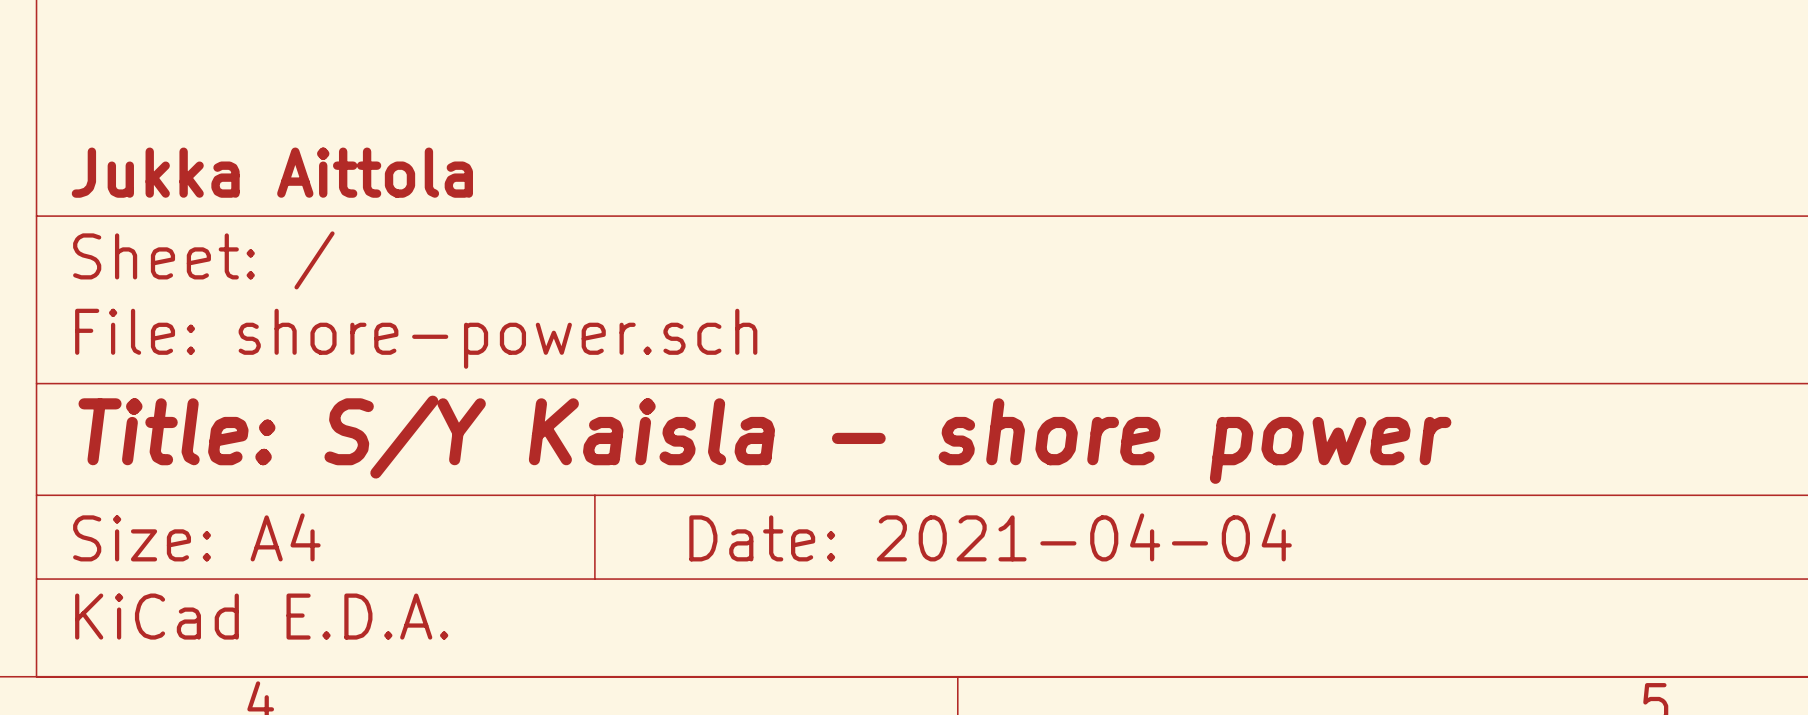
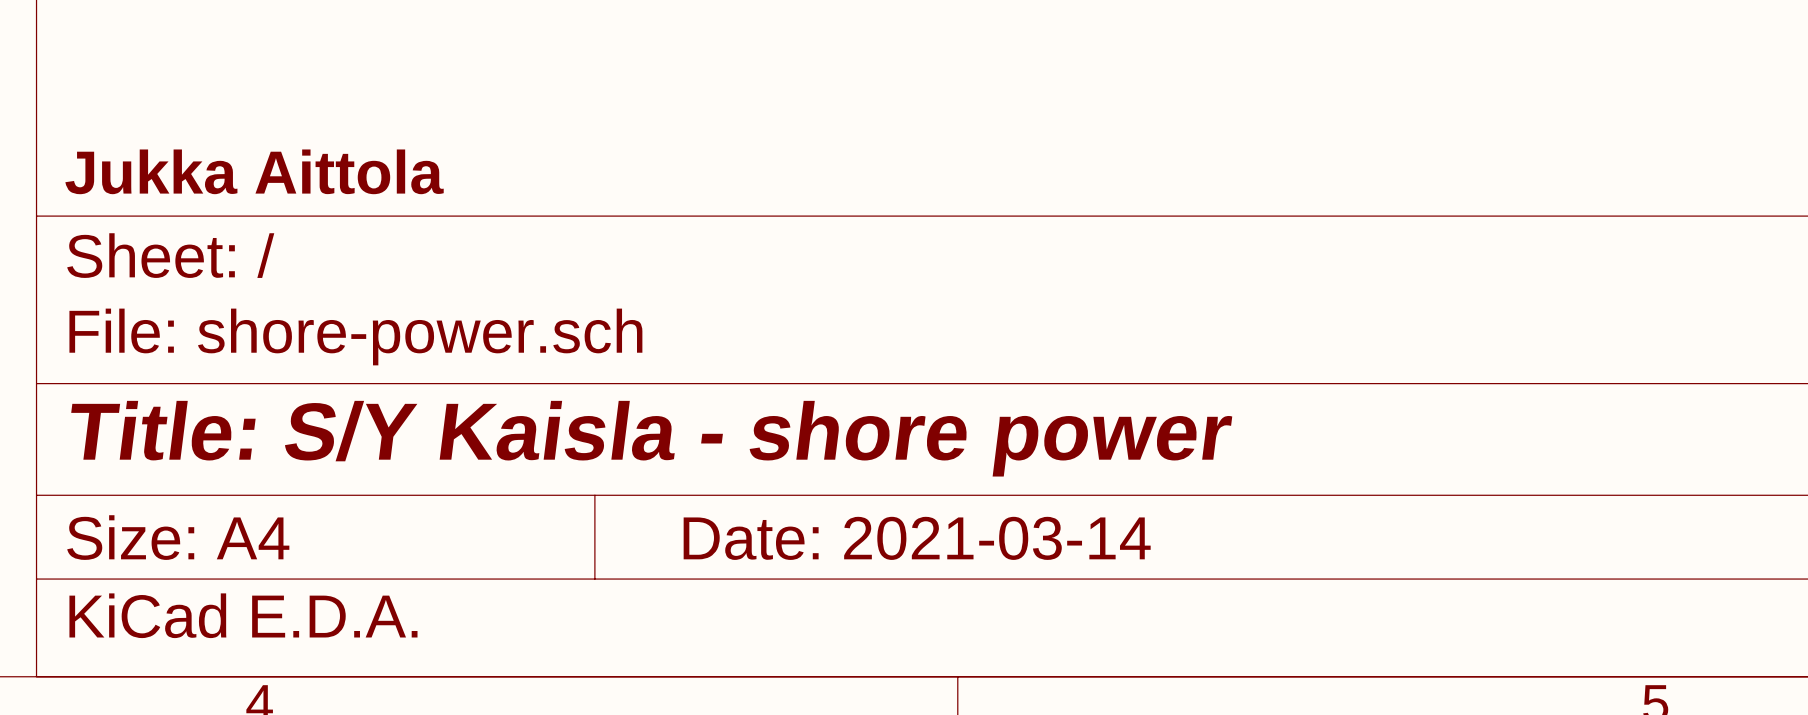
title block: Date: 2021-04-04 (990, 537) -> Date: 2021-03-14 (917, 538)

